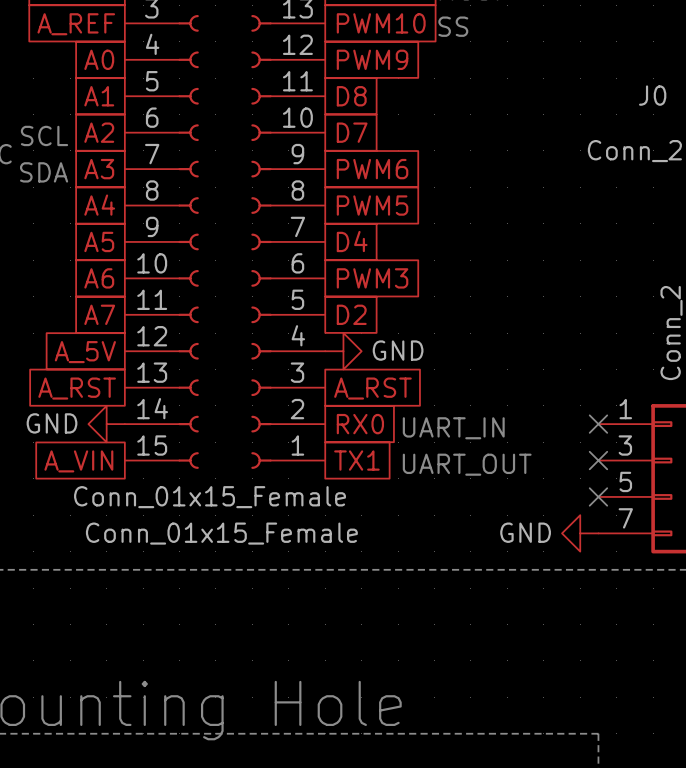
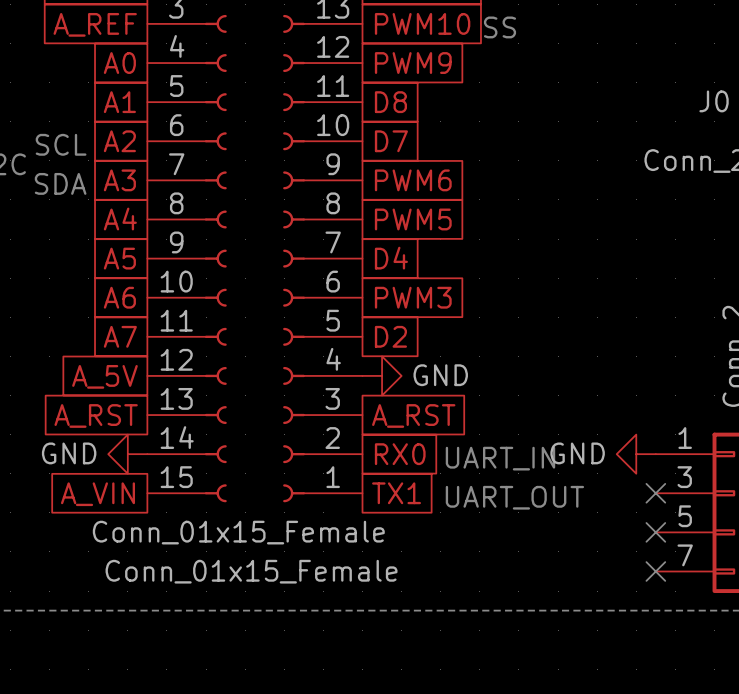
no-connect mark: (598, 424) -> none
power symbol position: GND (580, 533) -> GND (636, 454)
no-connect mark: none -> (655, 571)

